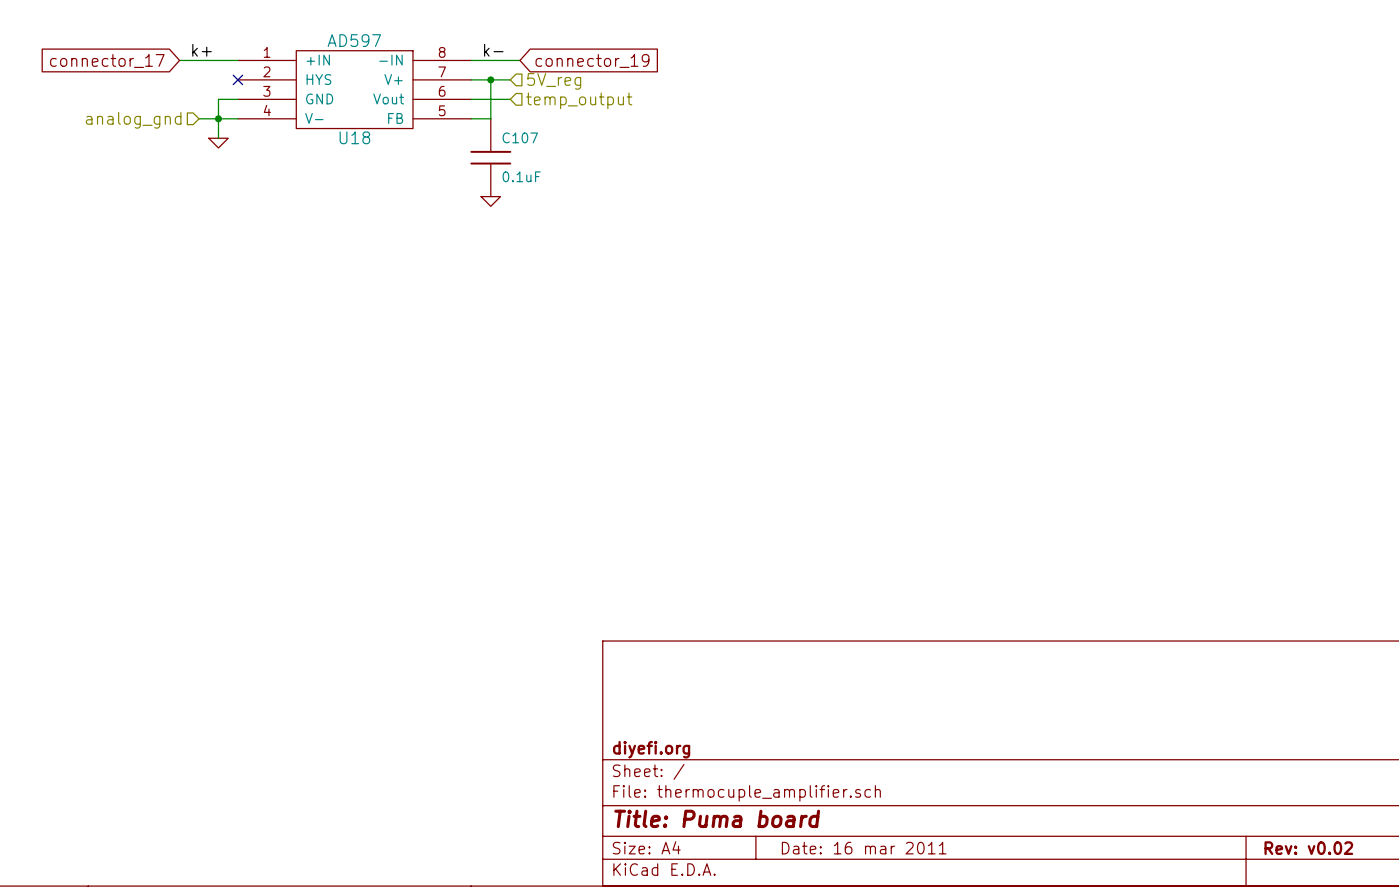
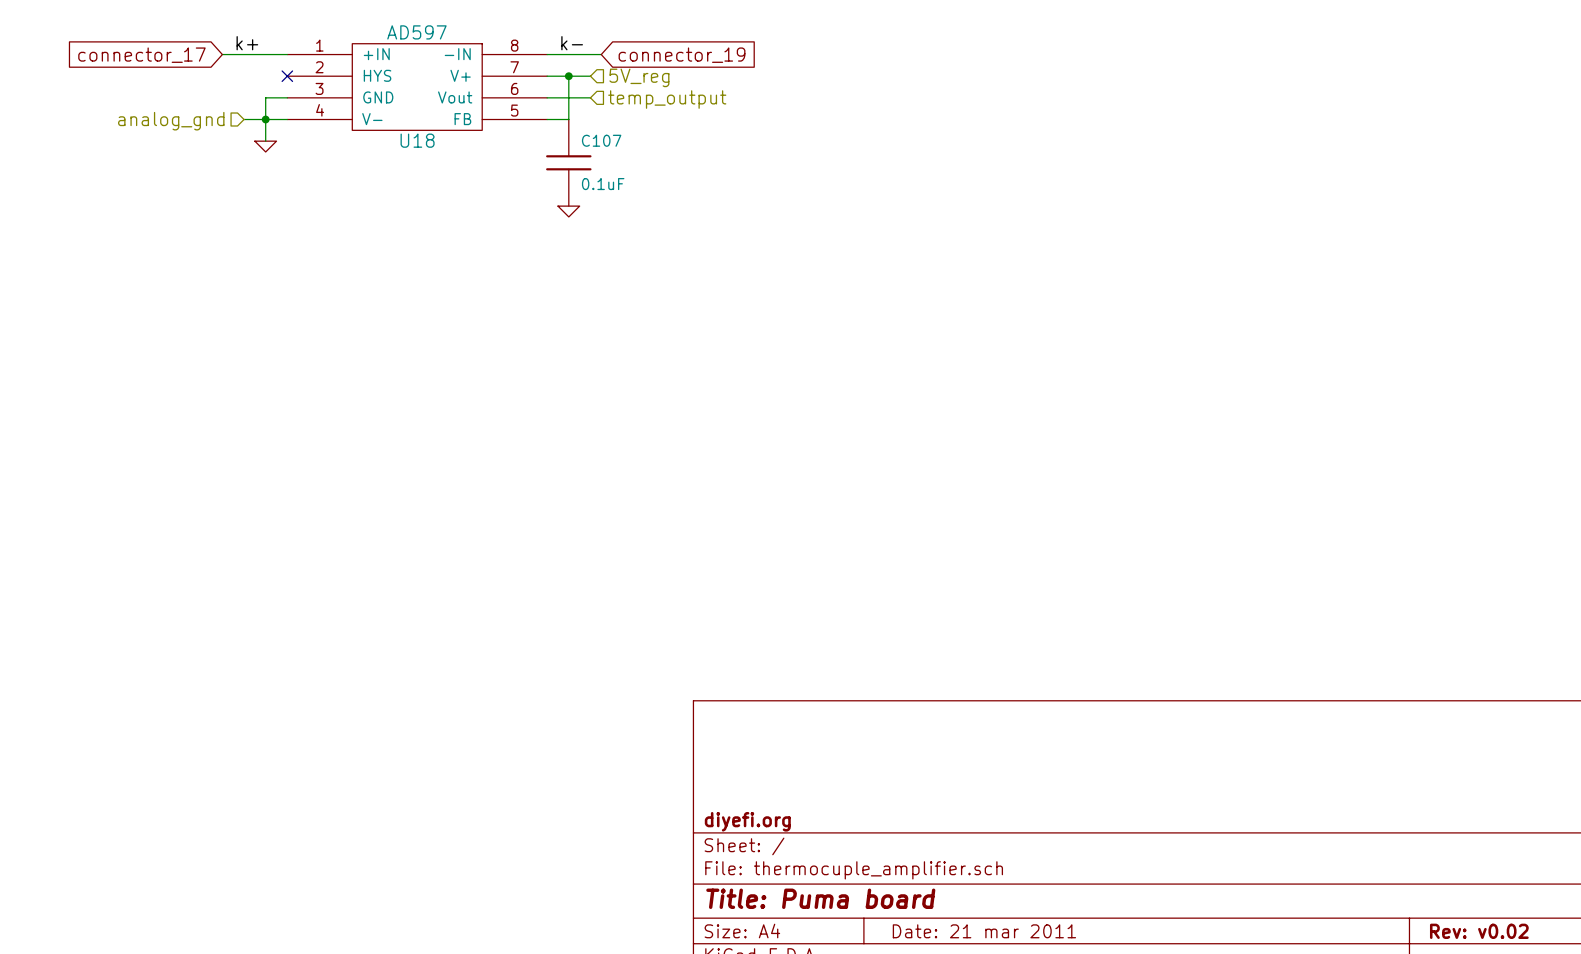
title block: Date: 16 mar 2011 (864, 848) -> Date: 21 mar 2011 (984, 931)

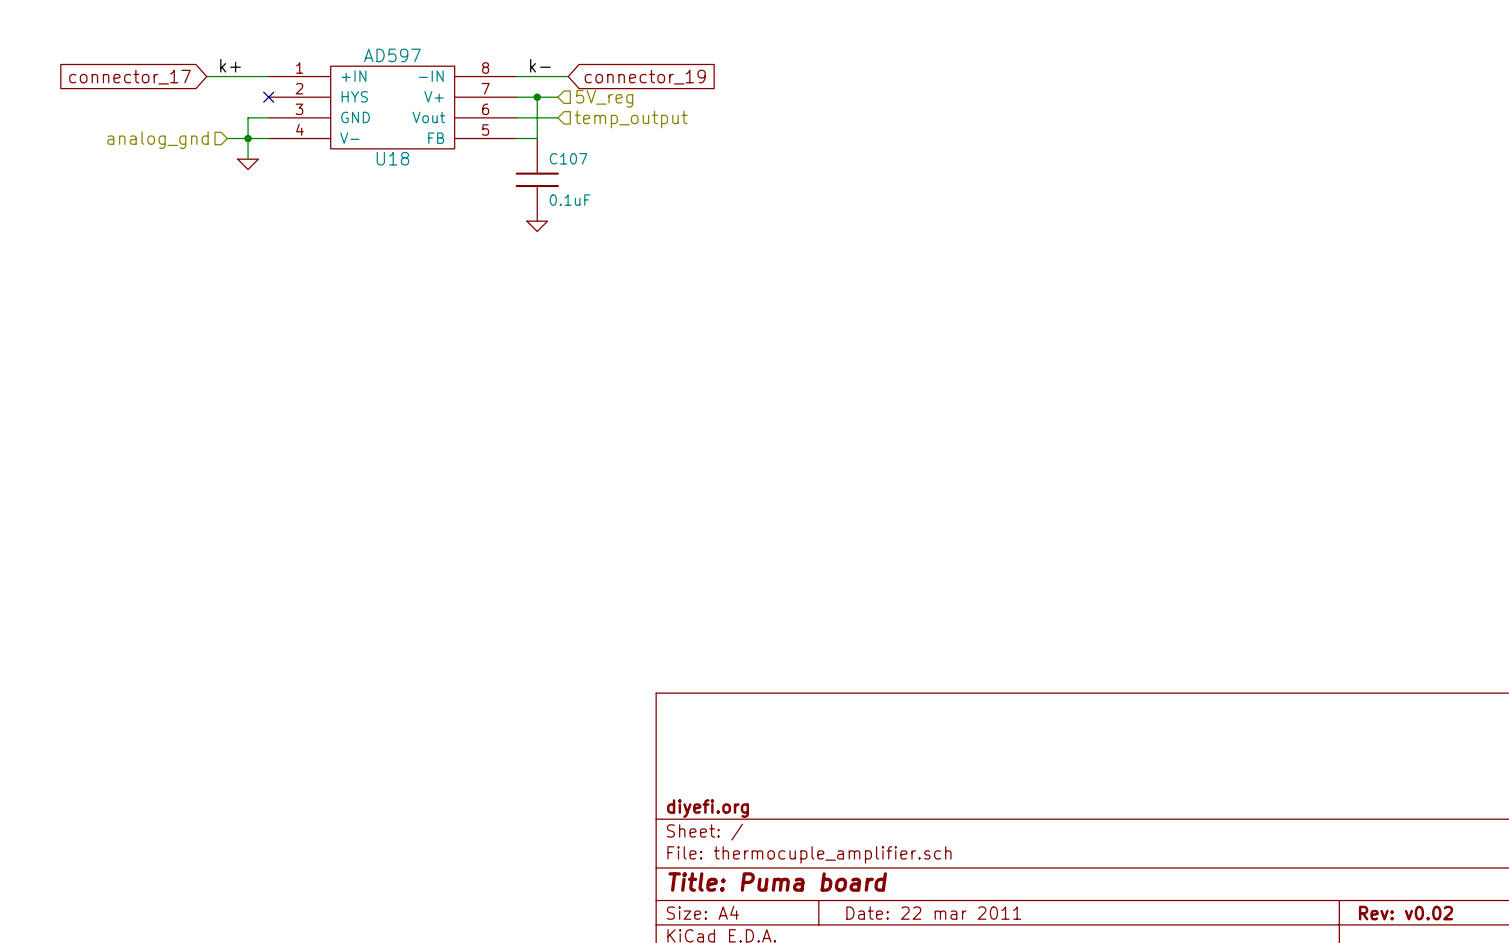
title block: Date: 21 mar 2011 (984, 931) -> Date: 22 mar 2011 (933, 913)

